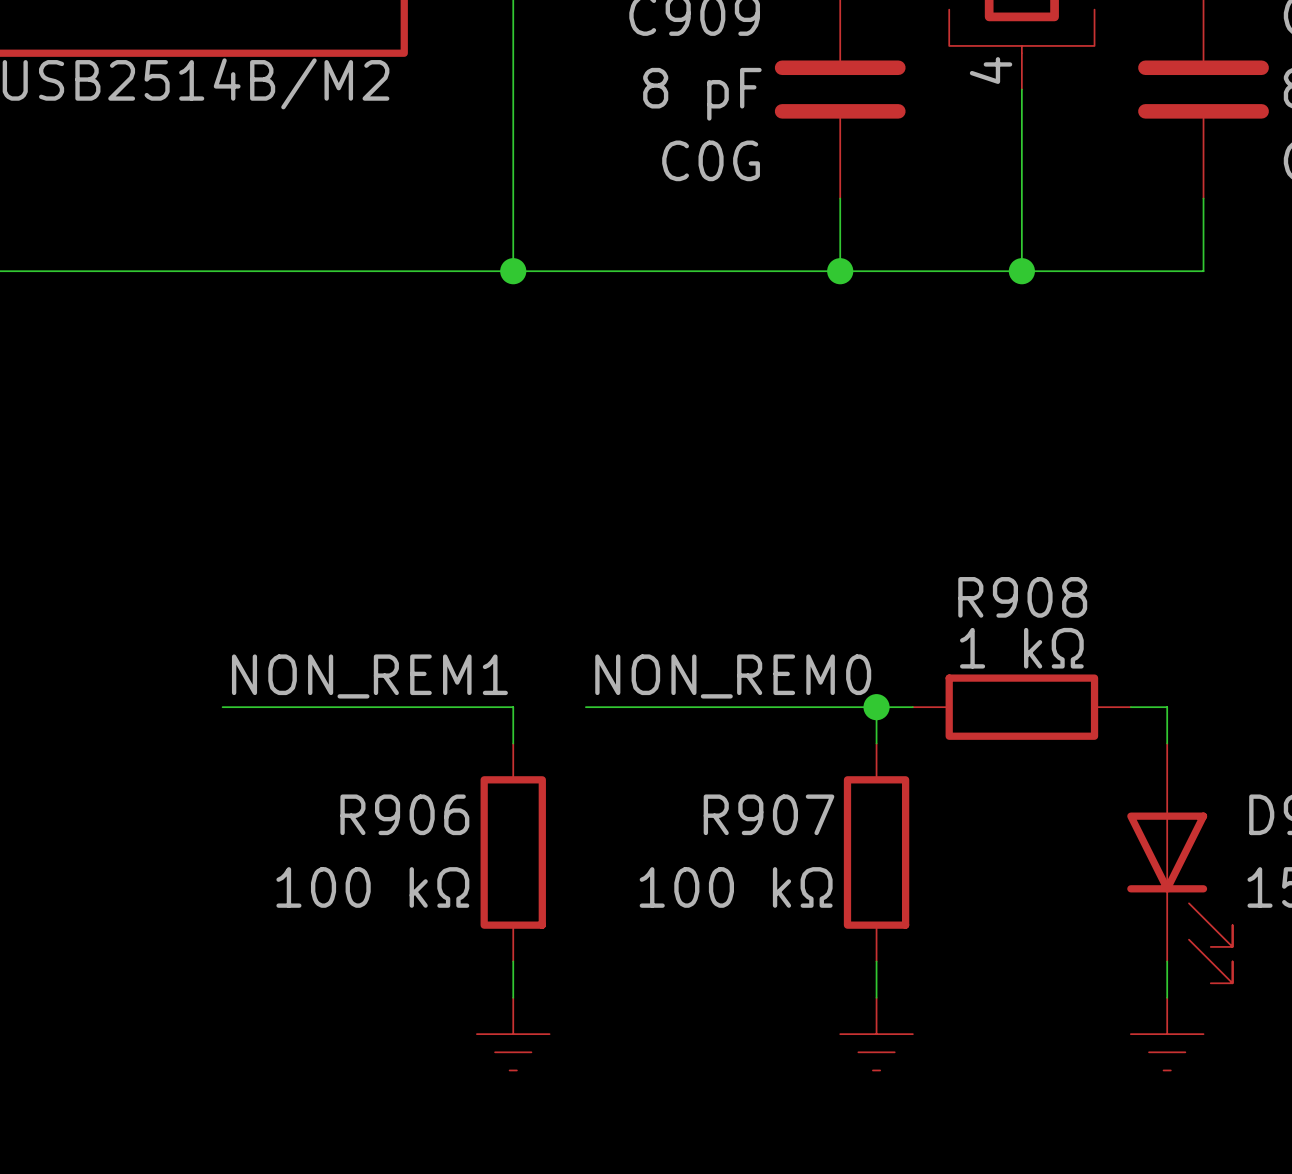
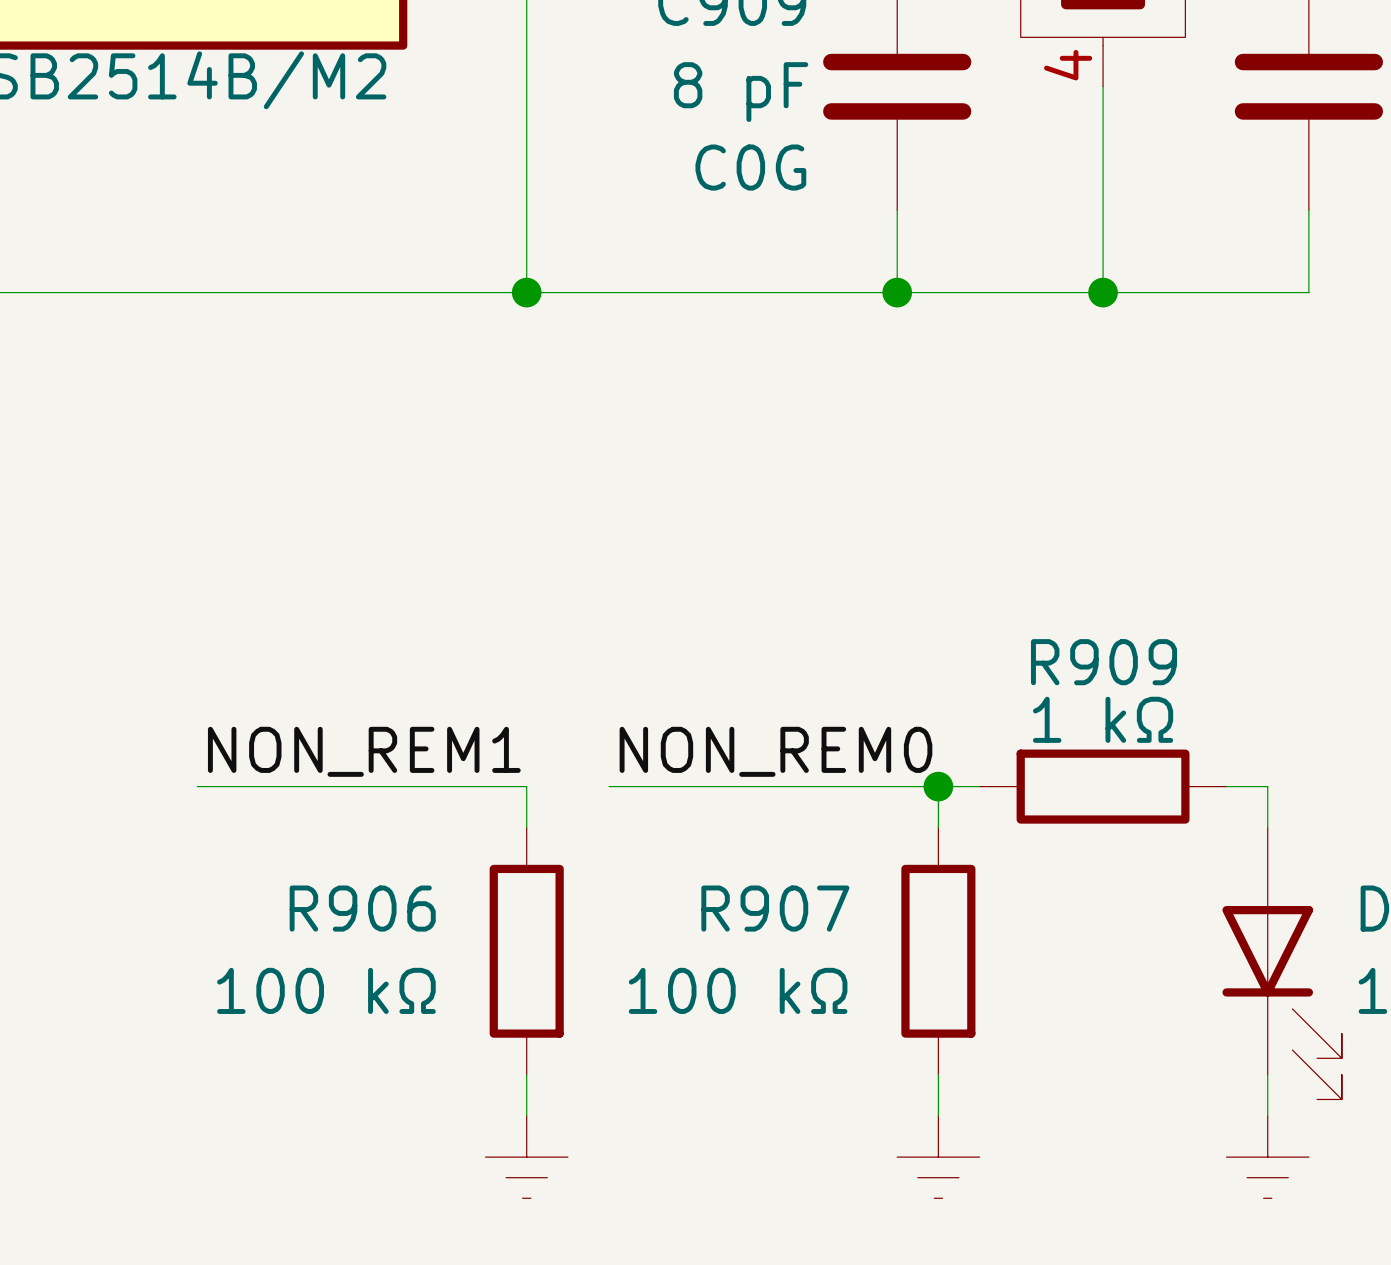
R908 name: R908 (1022, 597) -> R909 (1104, 662)
R906 name position: R906 (404, 814) -> R906 (362, 908)
R907 name position: R907 (769, 814) -> R907 (775, 908)
R906 value position: 100 kΩ (372, 887) -> 100 kΩ (326, 990)
R907 value position: 100 kΩ (736, 887) -> 100 kΩ (738, 990)

